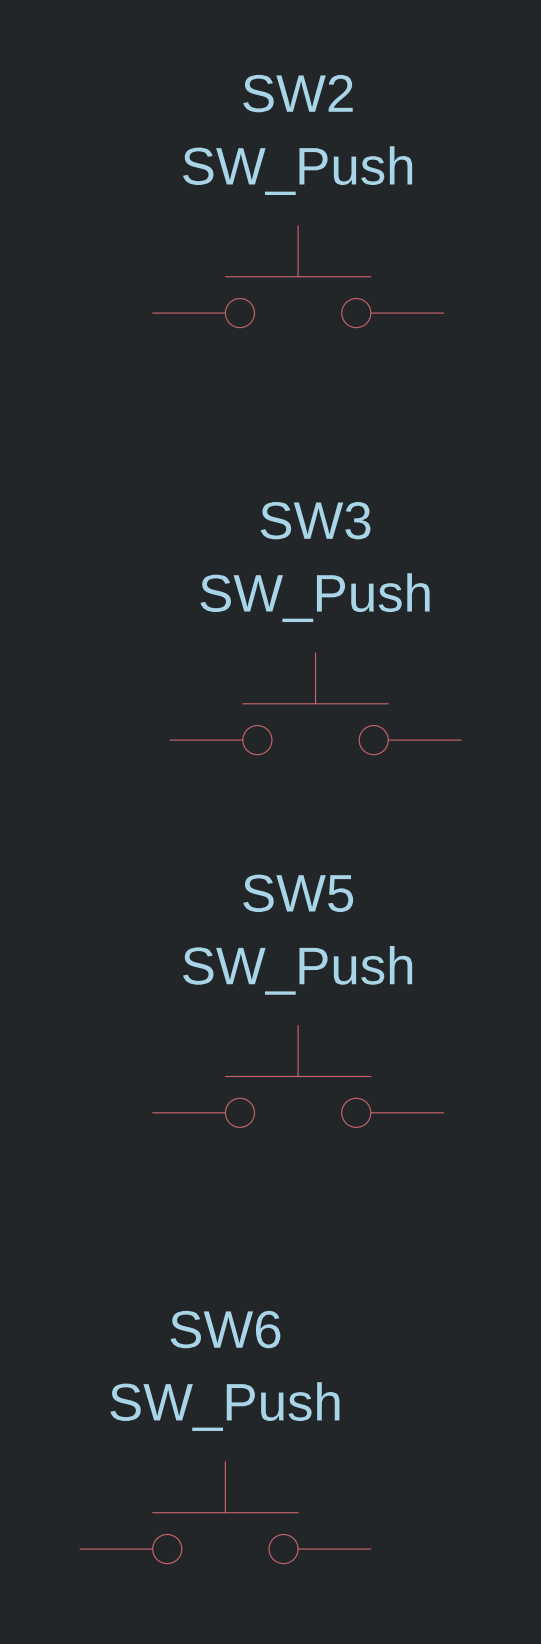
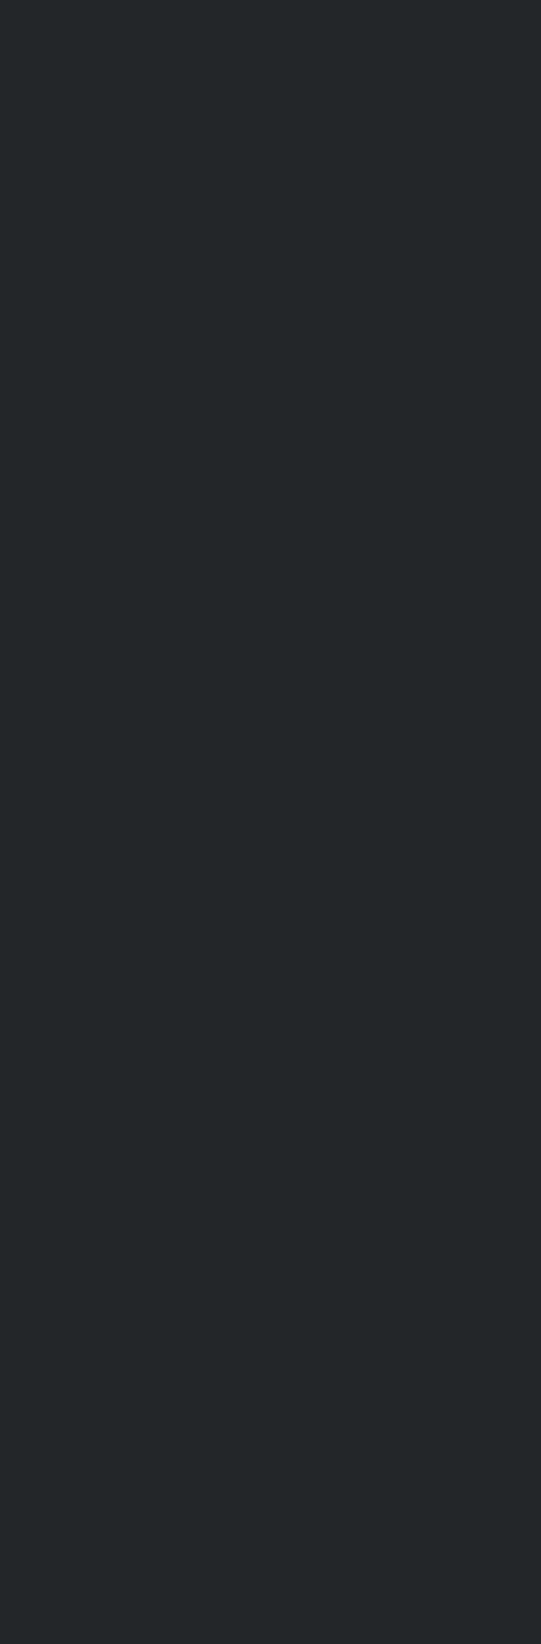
SW2: SW_Push (298, 276) -> none
SW3: SW_Push (315, 703) -> none
SW5: SW_Push (298, 1076) -> none
SW6: SW_Push (225, 1512) -> none

